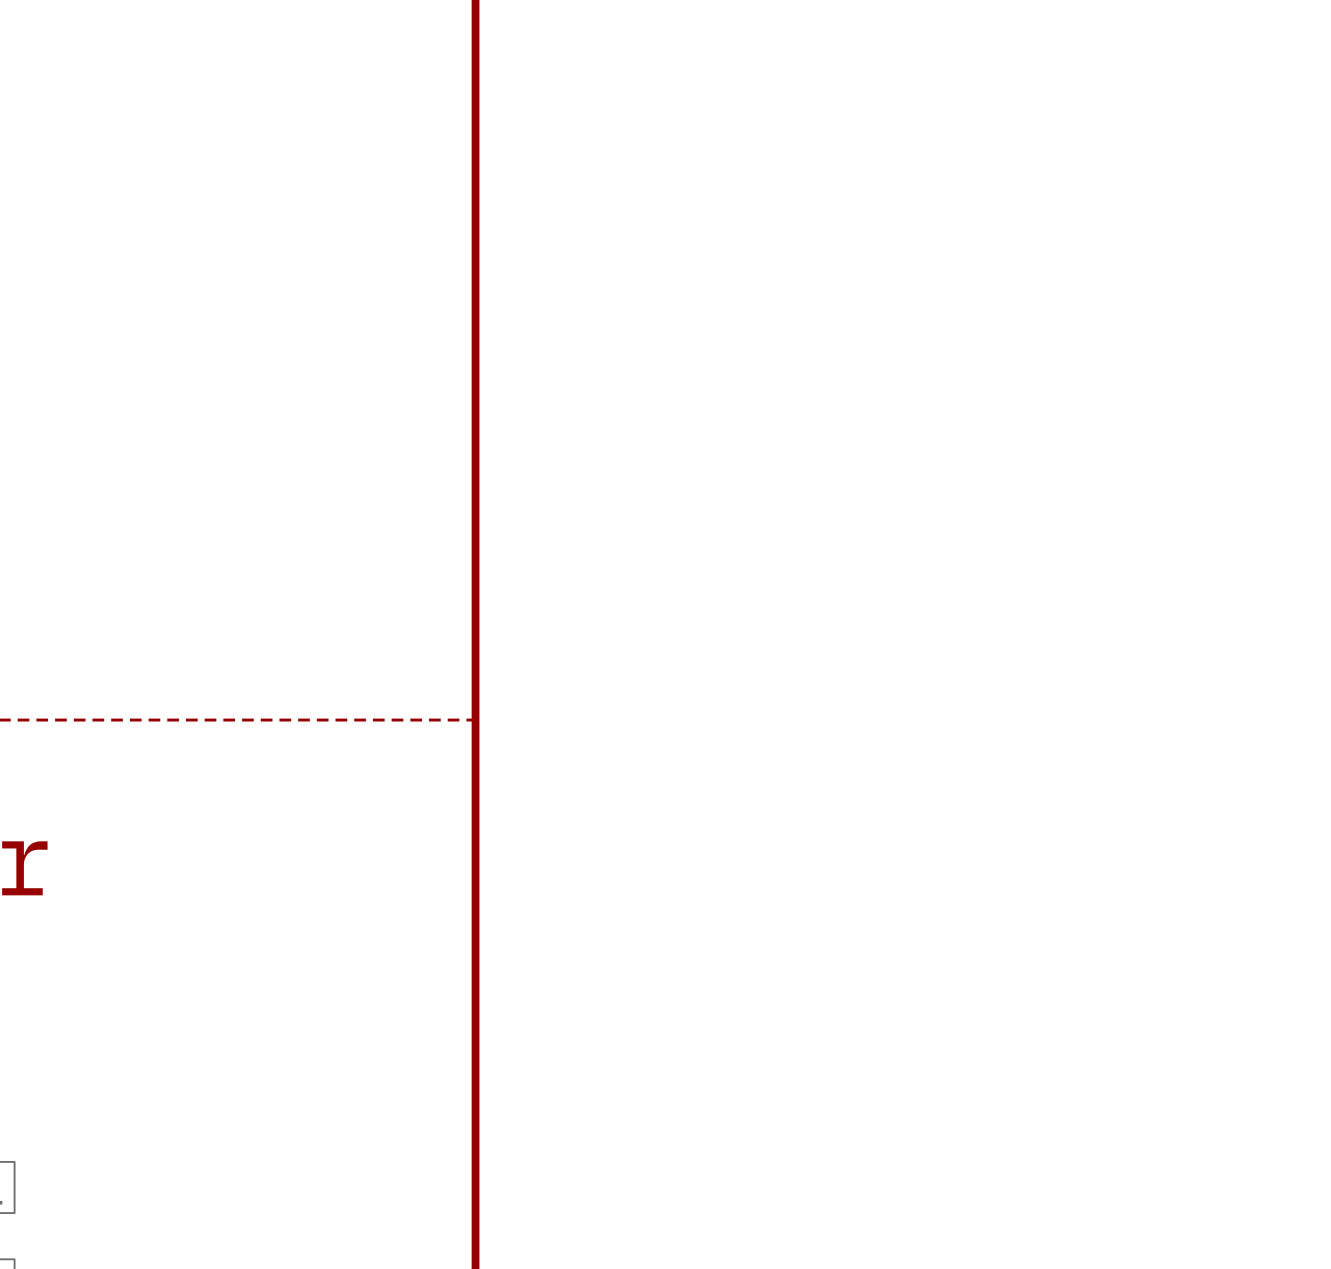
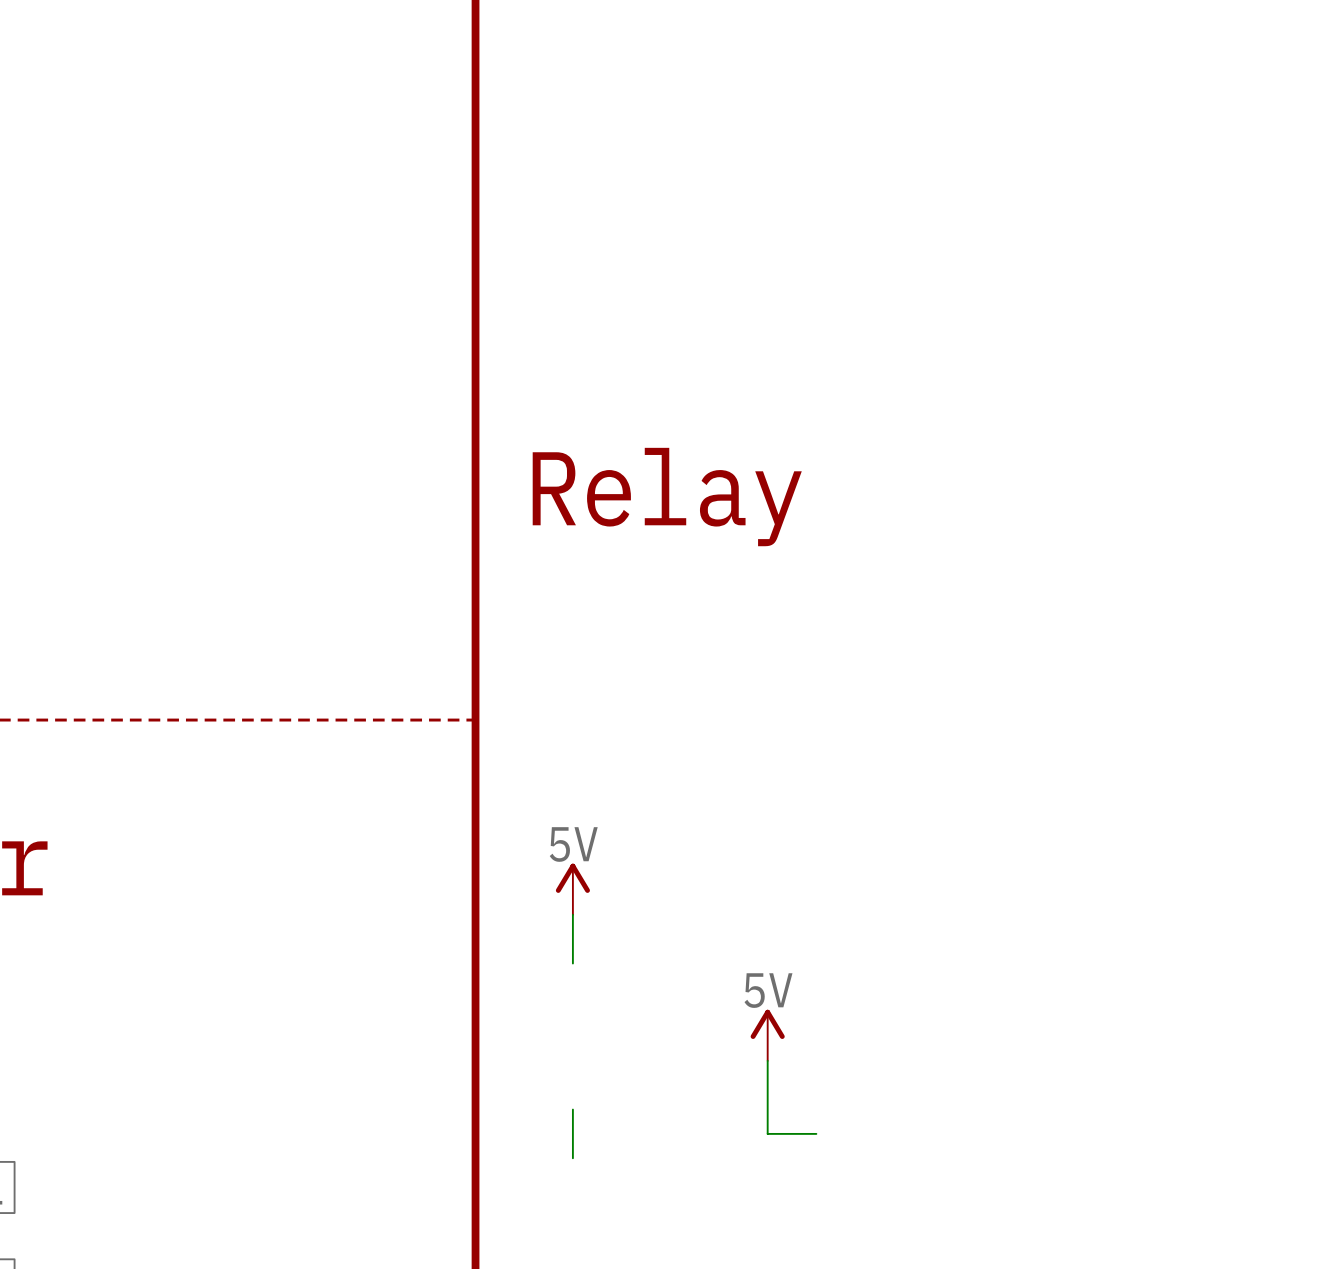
text: none -> Relay (667, 497)
power symbol: none -> 5V (572, 889)
wire: none -> (572, 914) (572, 963)
power symbol: none -> 5V (767, 1035)
wire: none -> (767, 1060) (767, 1133) (816, 1133)
wire: none -> (572, 1109) (572, 1158)

